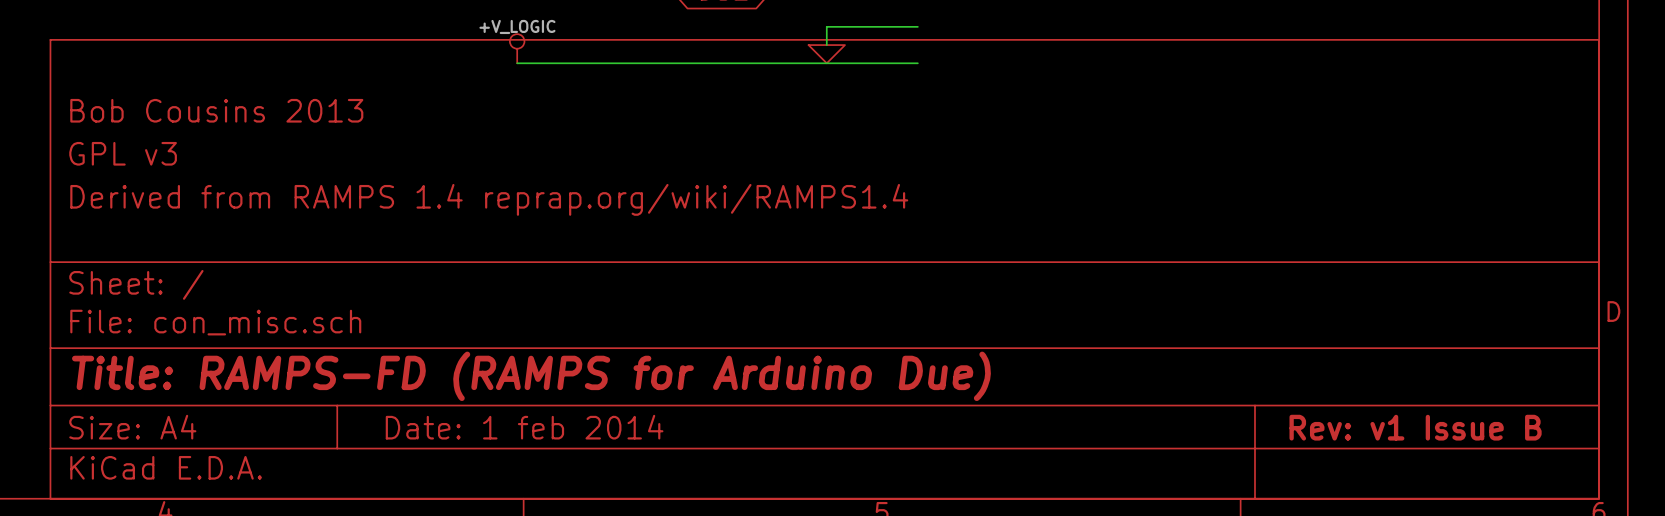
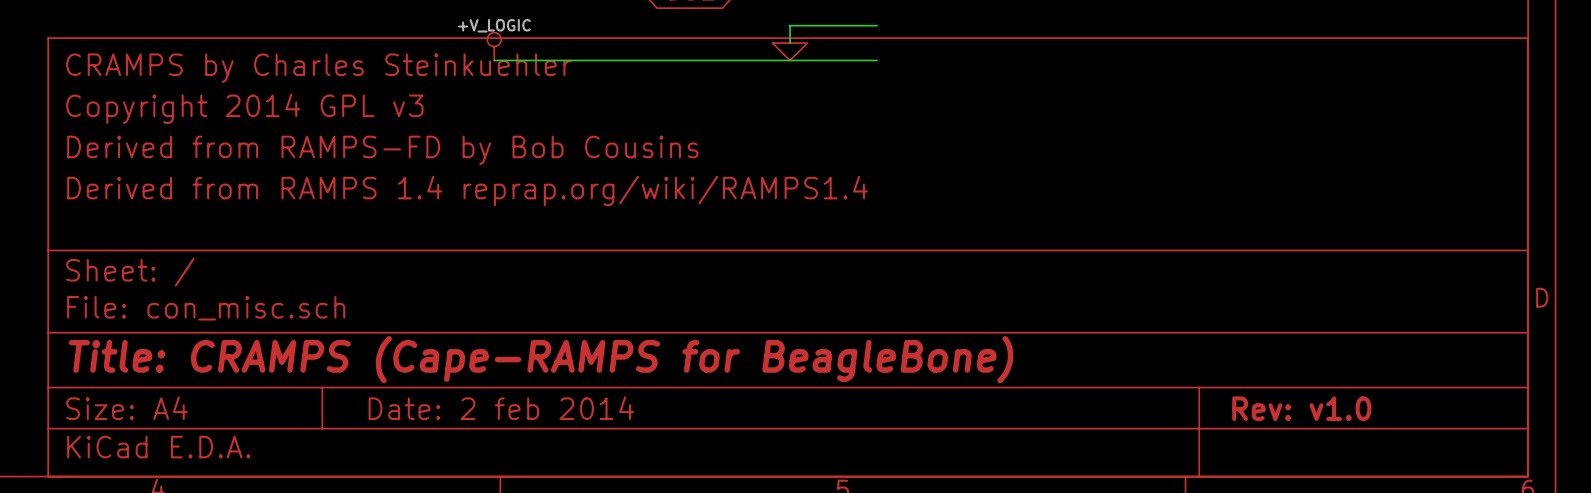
title block: none -> CRAMPS by Charles Steinkuehler (318, 68)
title block: Bob Cousins 2013 (216, 110) -> Copyright 2014 GPL v3 (244, 108)
title block: GPL v3 (123, 153) -> Derived from RAMPS-FD by Bob Cousins (382, 150)
title block: Title: RAMPS-FD (RAMPS for Arduino Due) (531, 376) -> Title: CRAMPS (Cape-RAMPS for BeagleBone) (541, 359)
title block: Date: 1 feb 2014 (524, 427) -> Date: 2 feb 2014 (501, 408)
title block: Rev: v1 Issue B (1415, 427) -> Rev: v1.0 (1301, 408)

